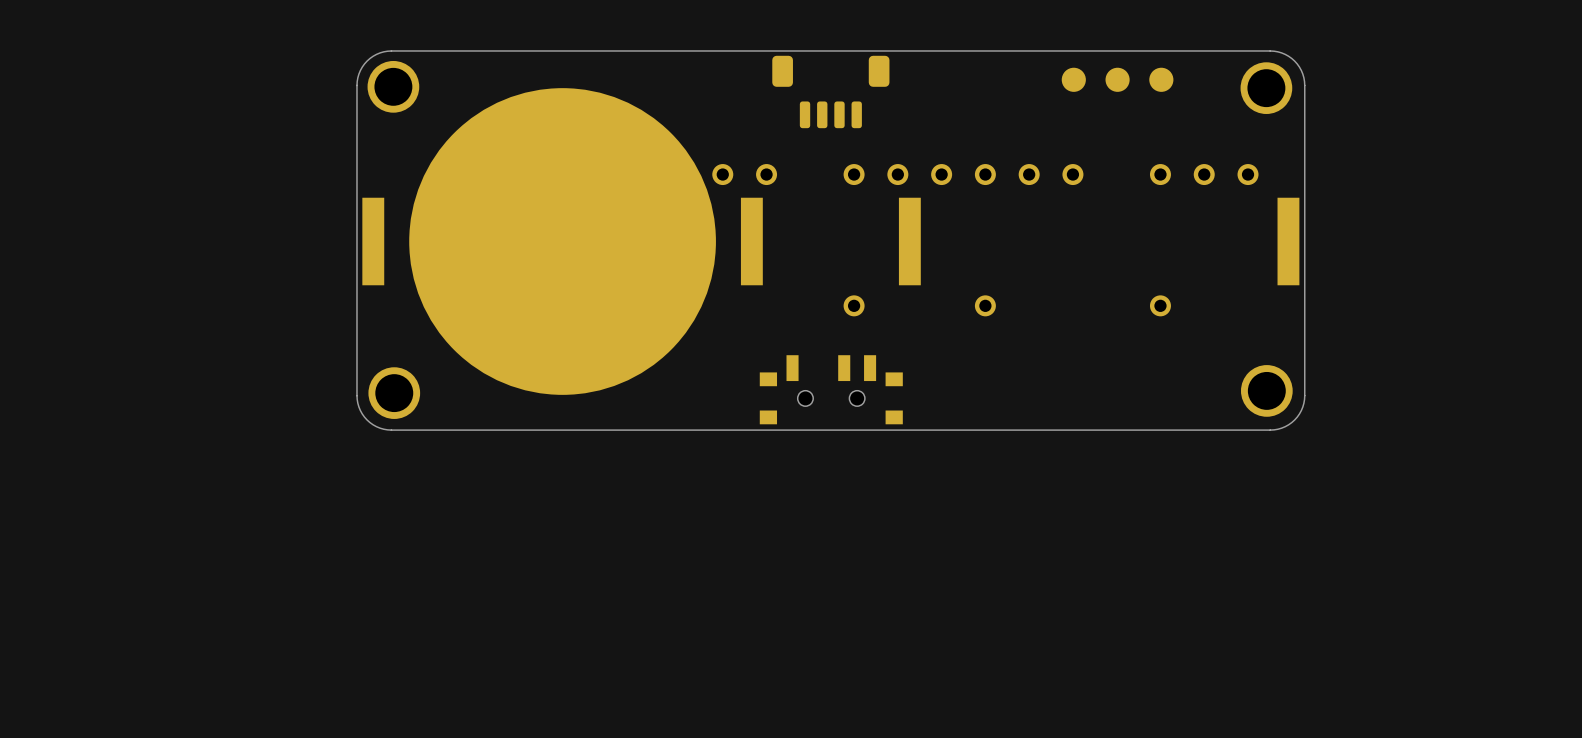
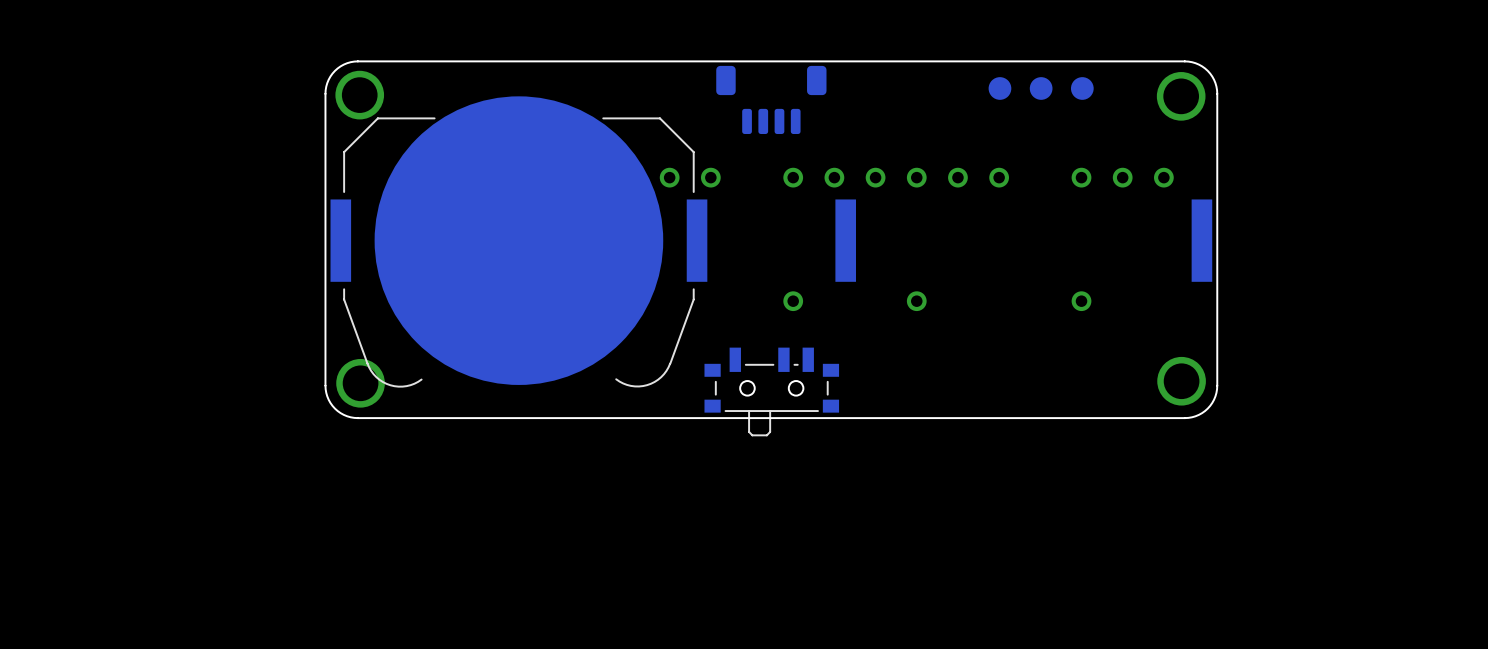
part footprint: [362, 88, 763, 395] -> [330, 96, 708, 388]
part footprint: [759, 355, 903, 425] -> [704, 347, 840, 437]

